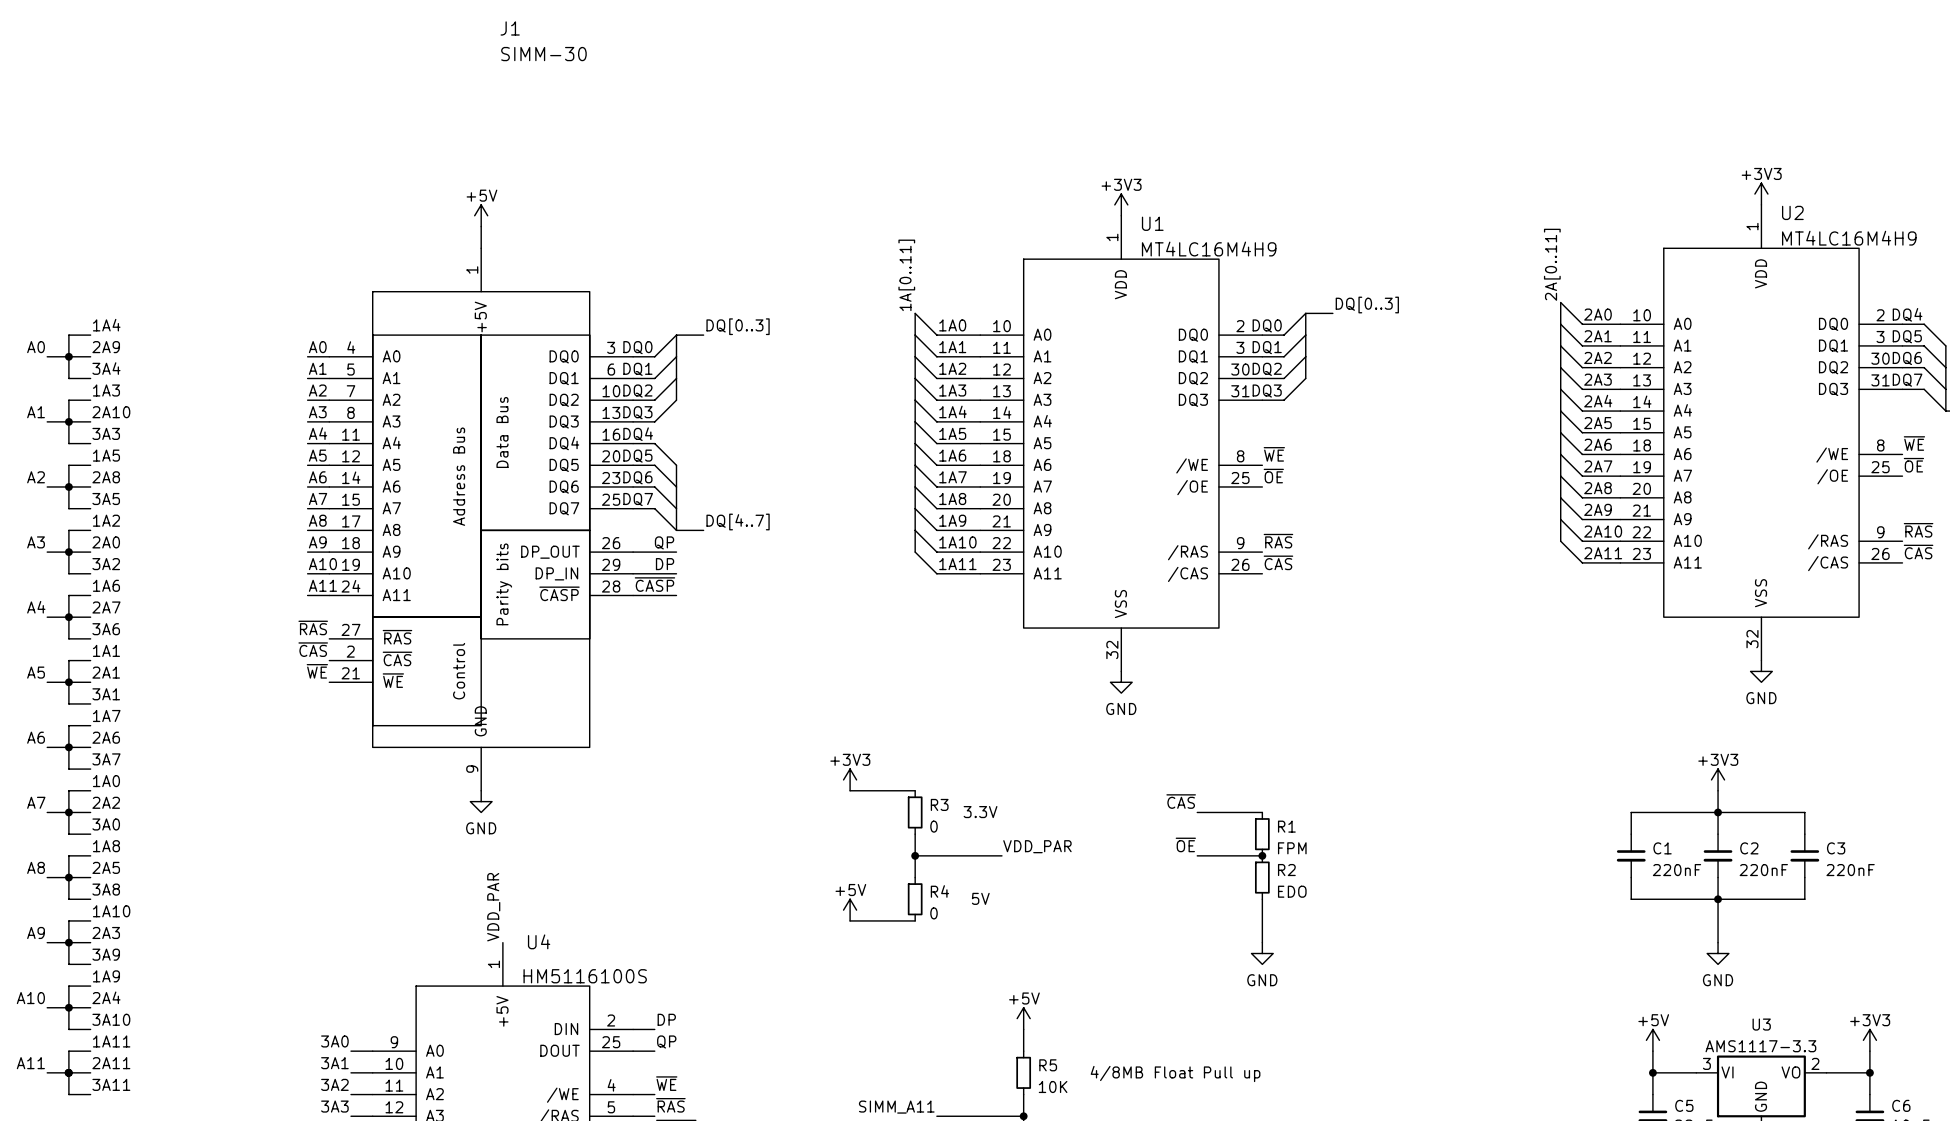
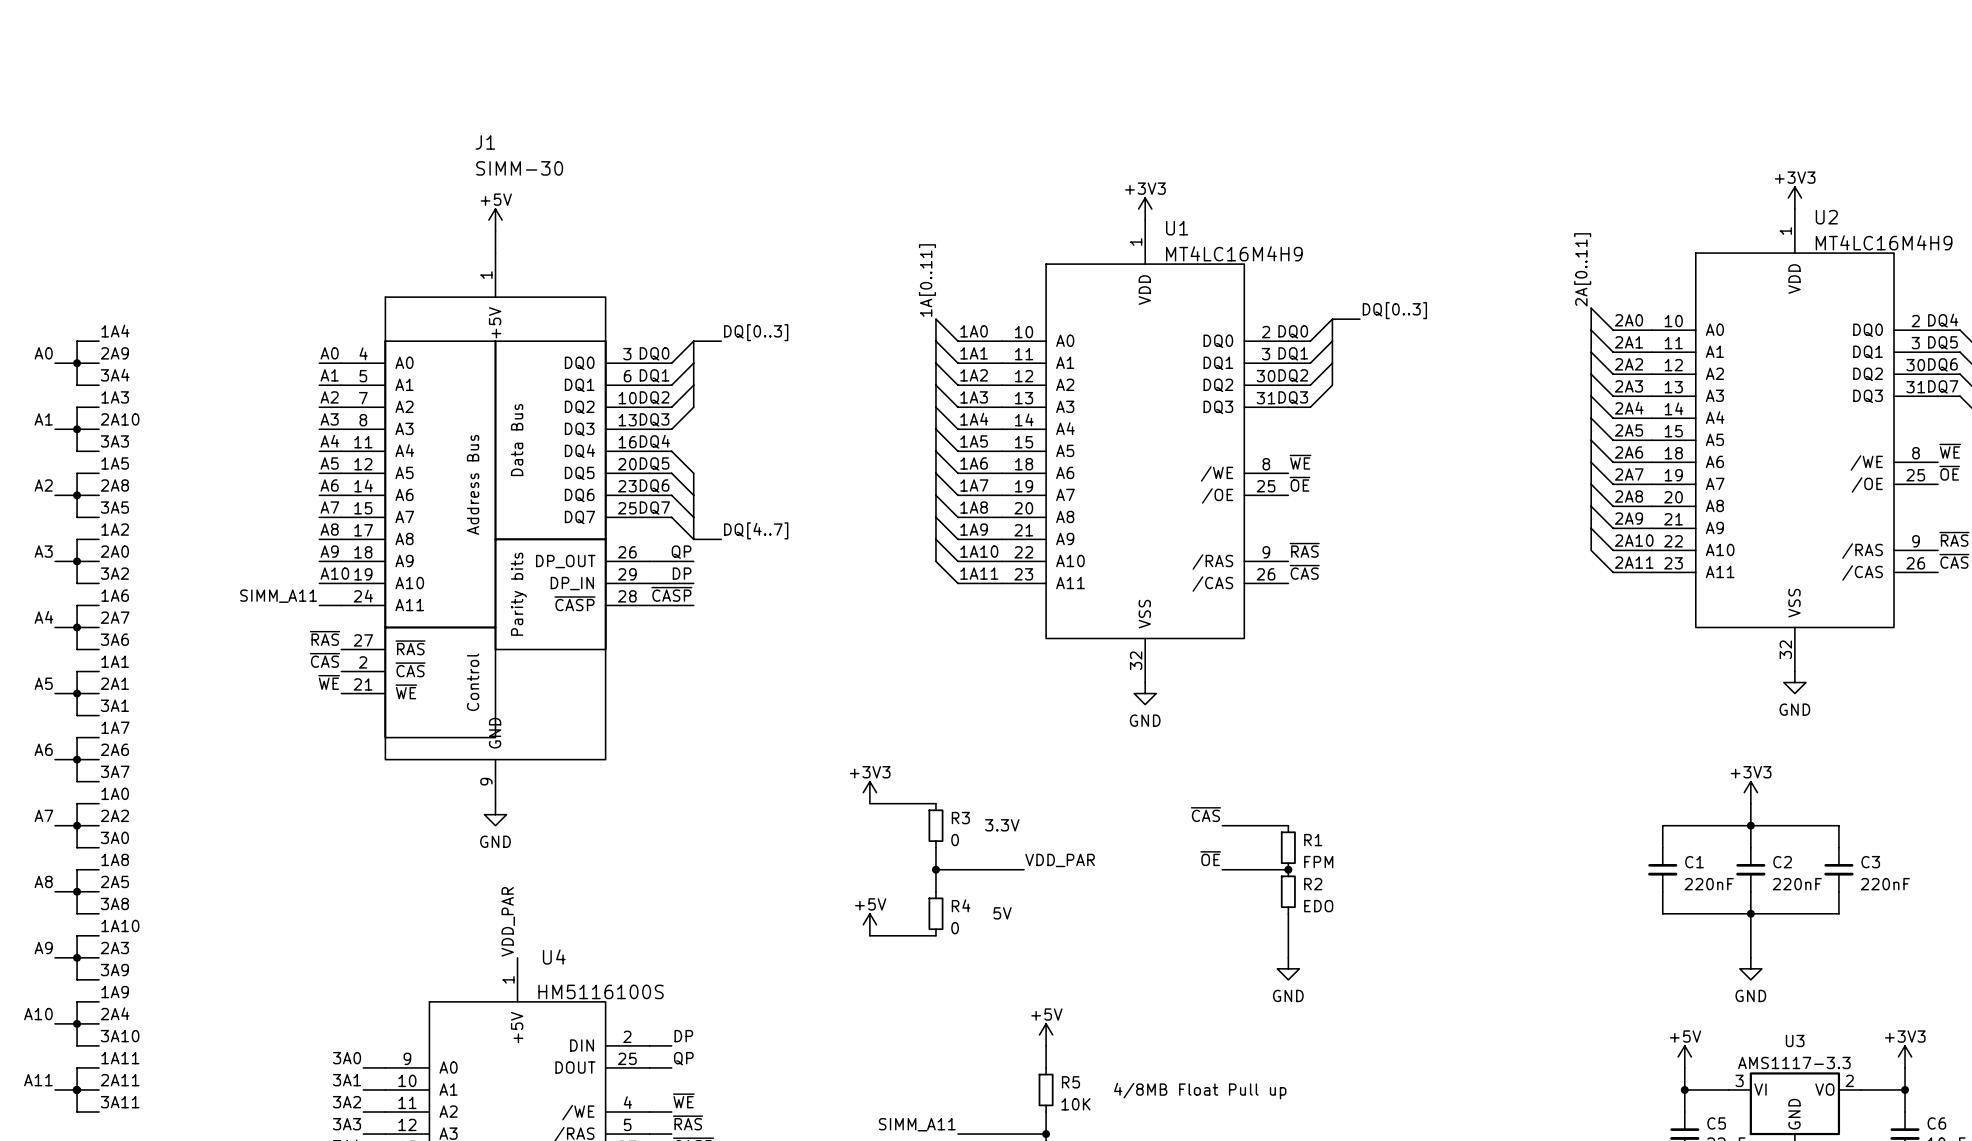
J1 name position: J1 (510, 28) -> J1 (485, 142)
J1 value position: SIMM-30 (543, 54) -> SIMM-30 (519, 168)
label: A11 (322, 585) -> SIMM_A11 (278, 596)

